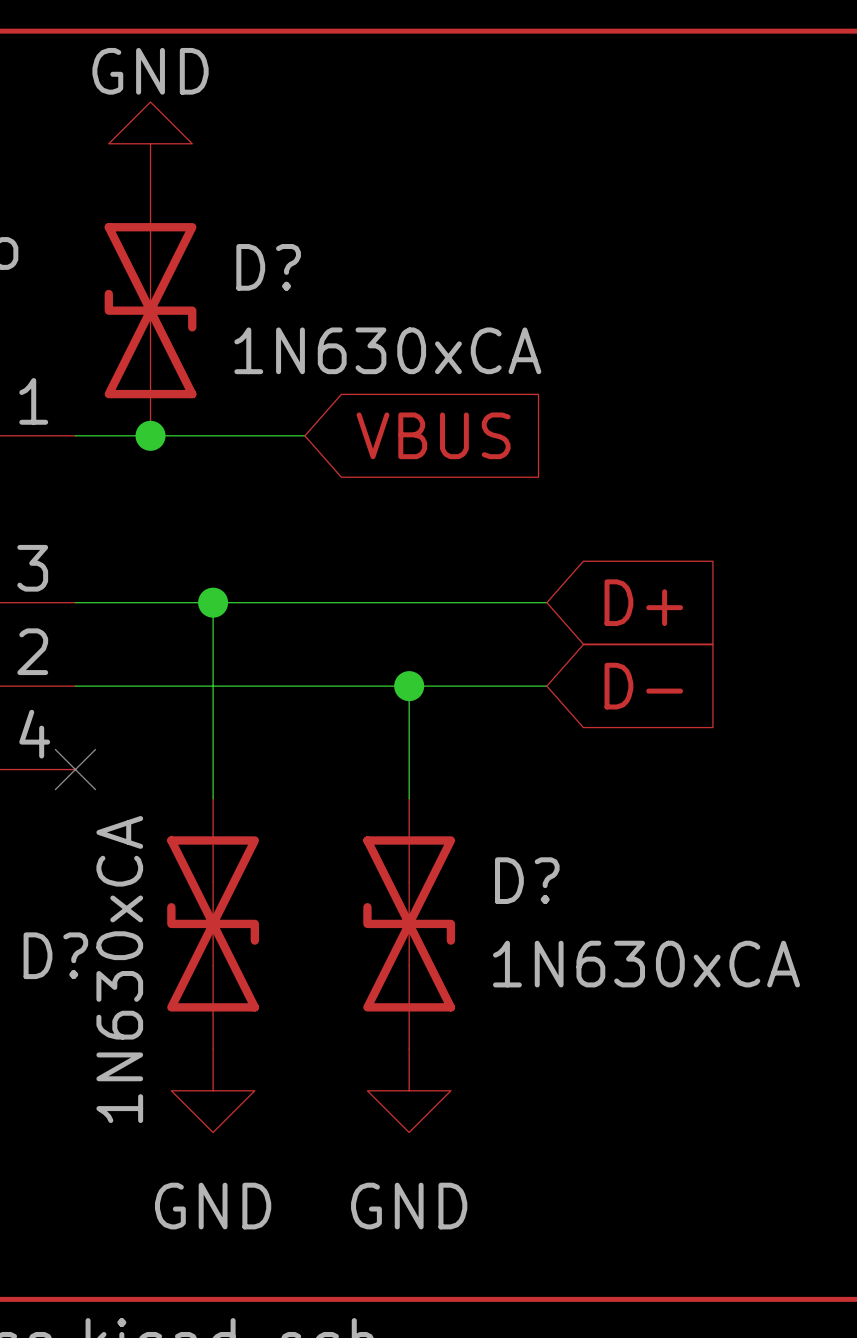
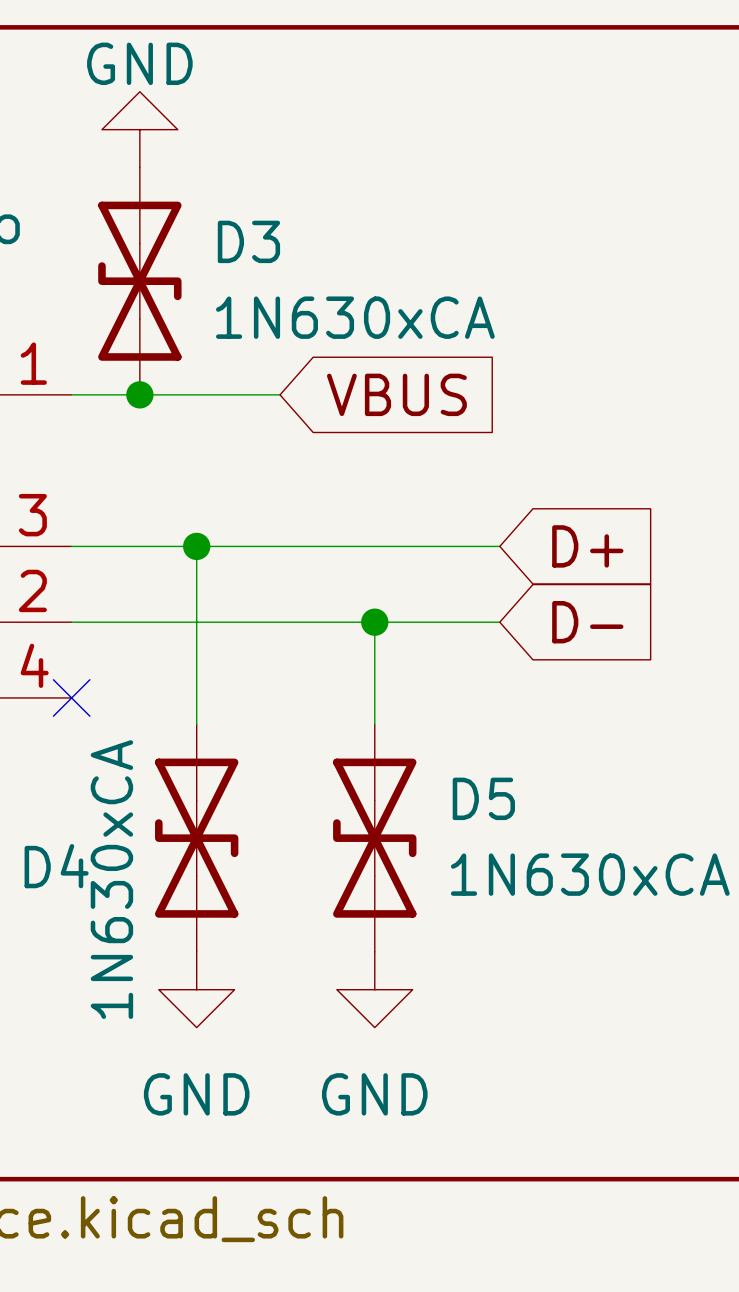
D? name: D? (268, 267) -> D3 (248, 241)
D? name: D? (527, 880) -> D5 (483, 798)
D? name: D? (55, 955) -> D4 (56, 866)

